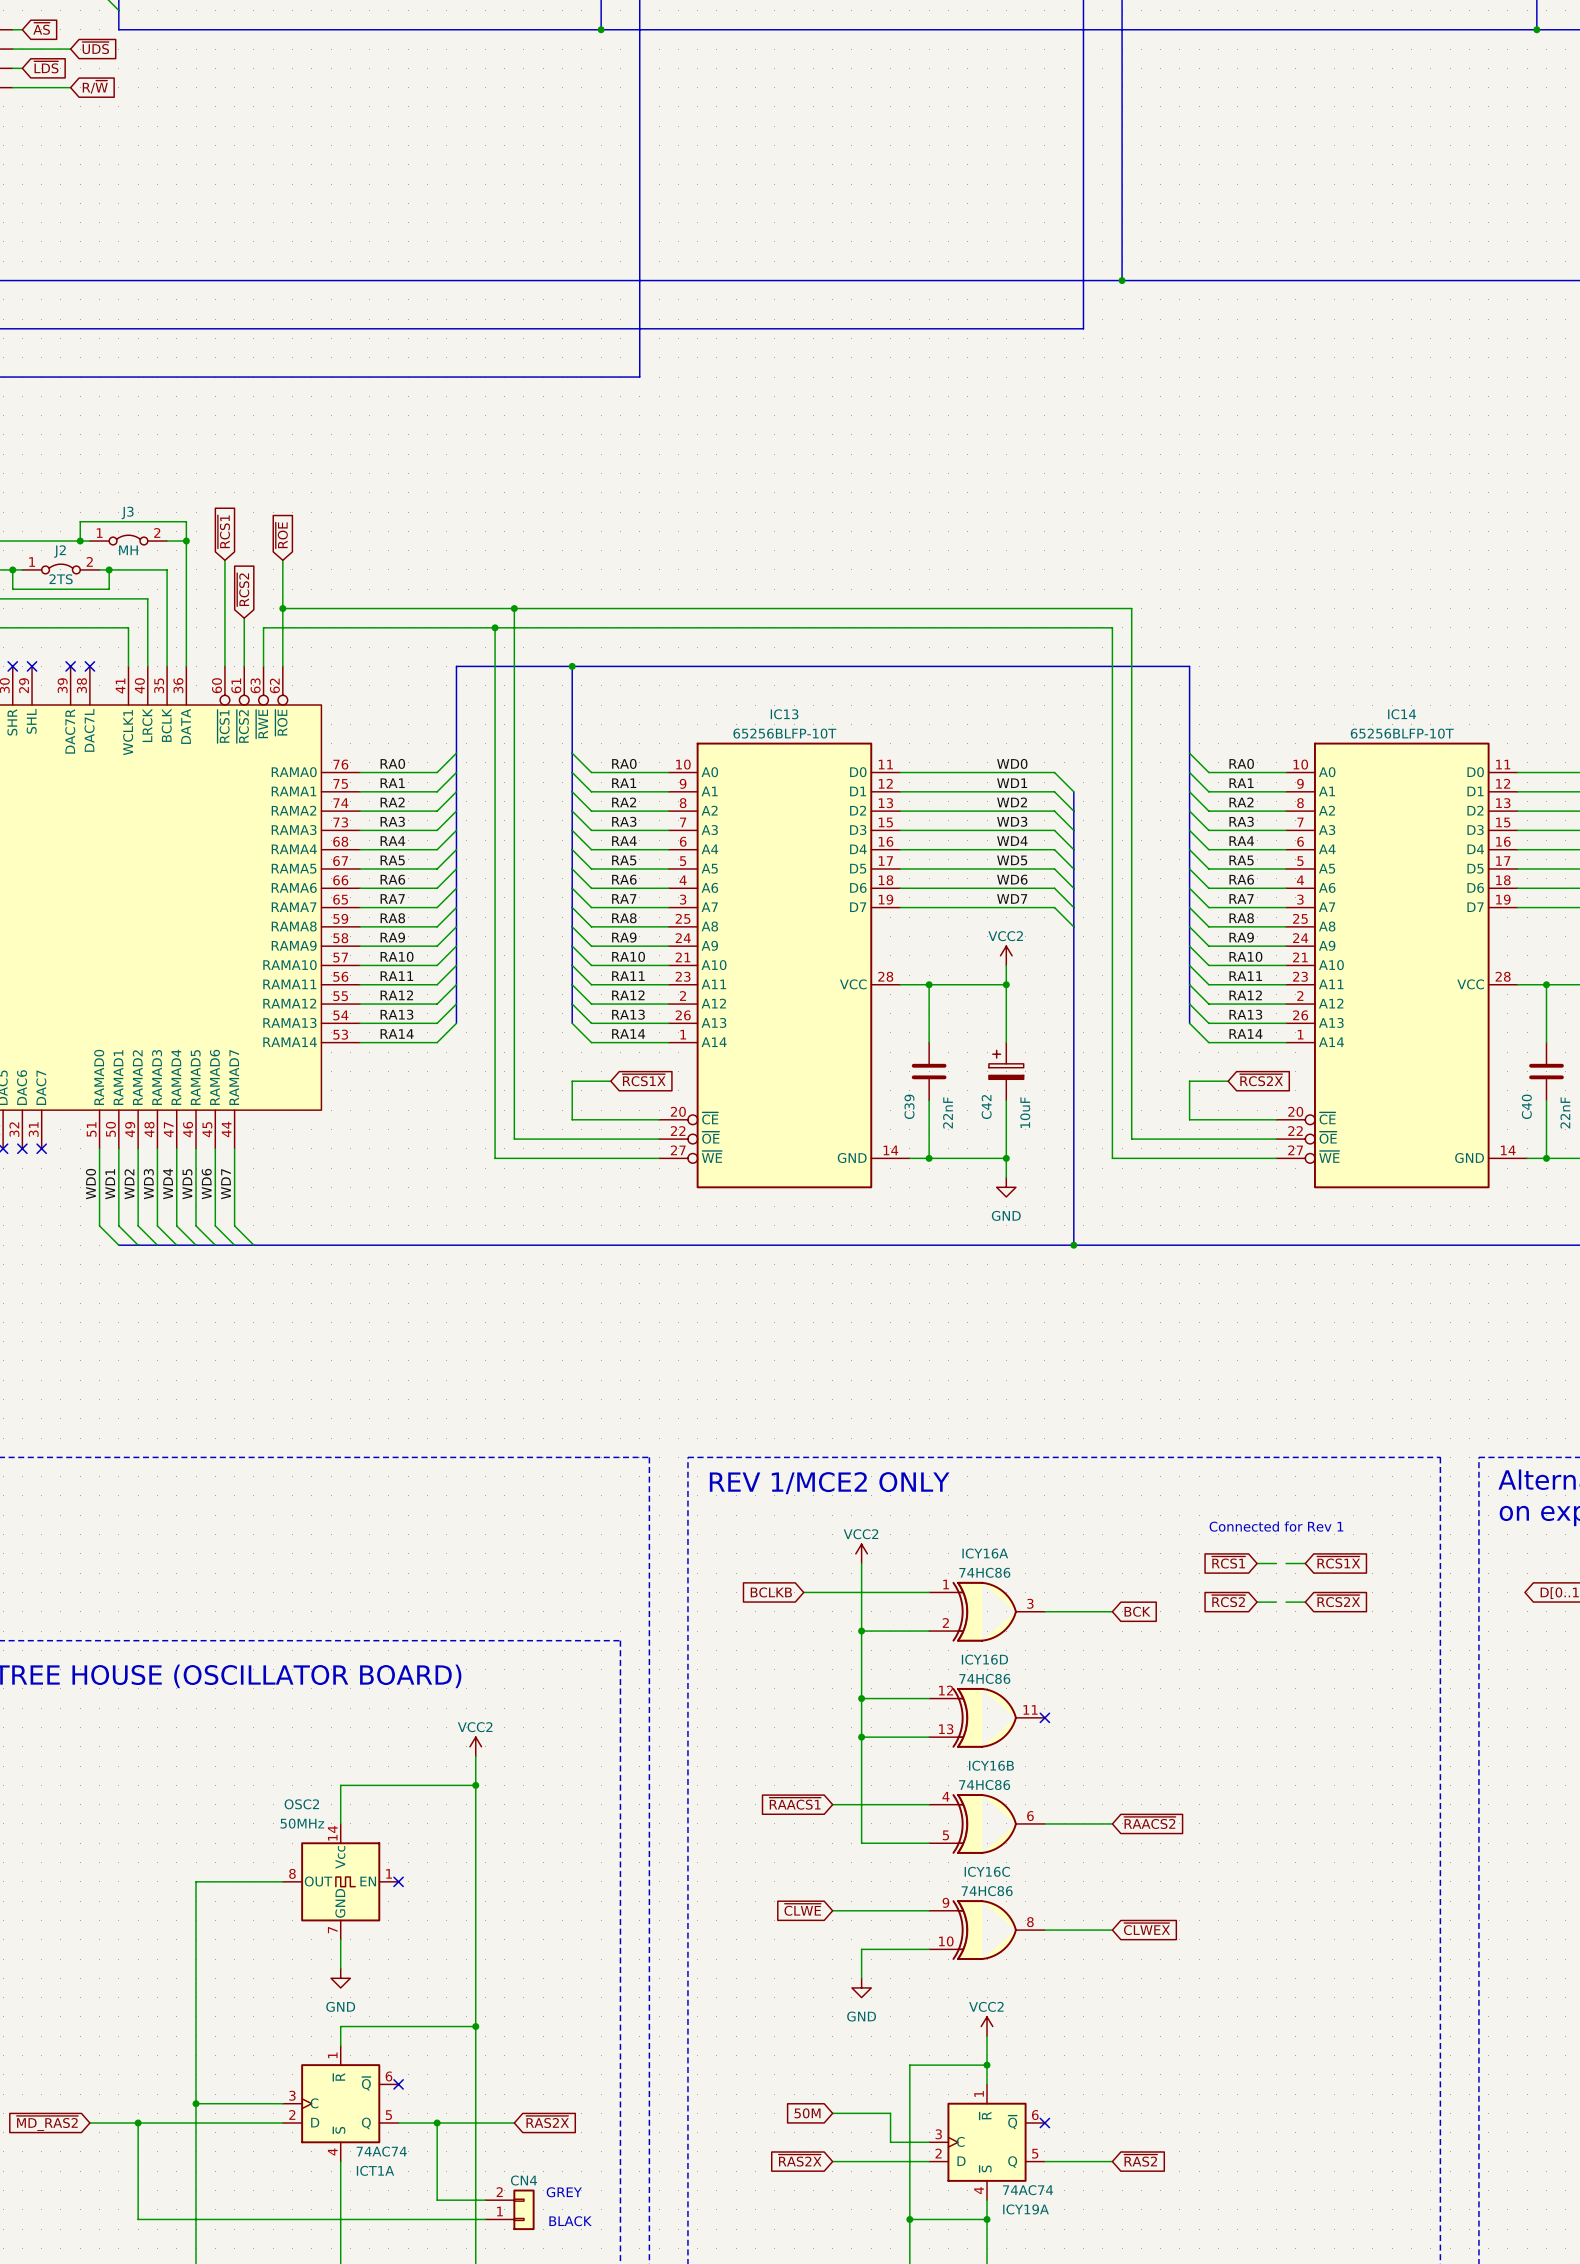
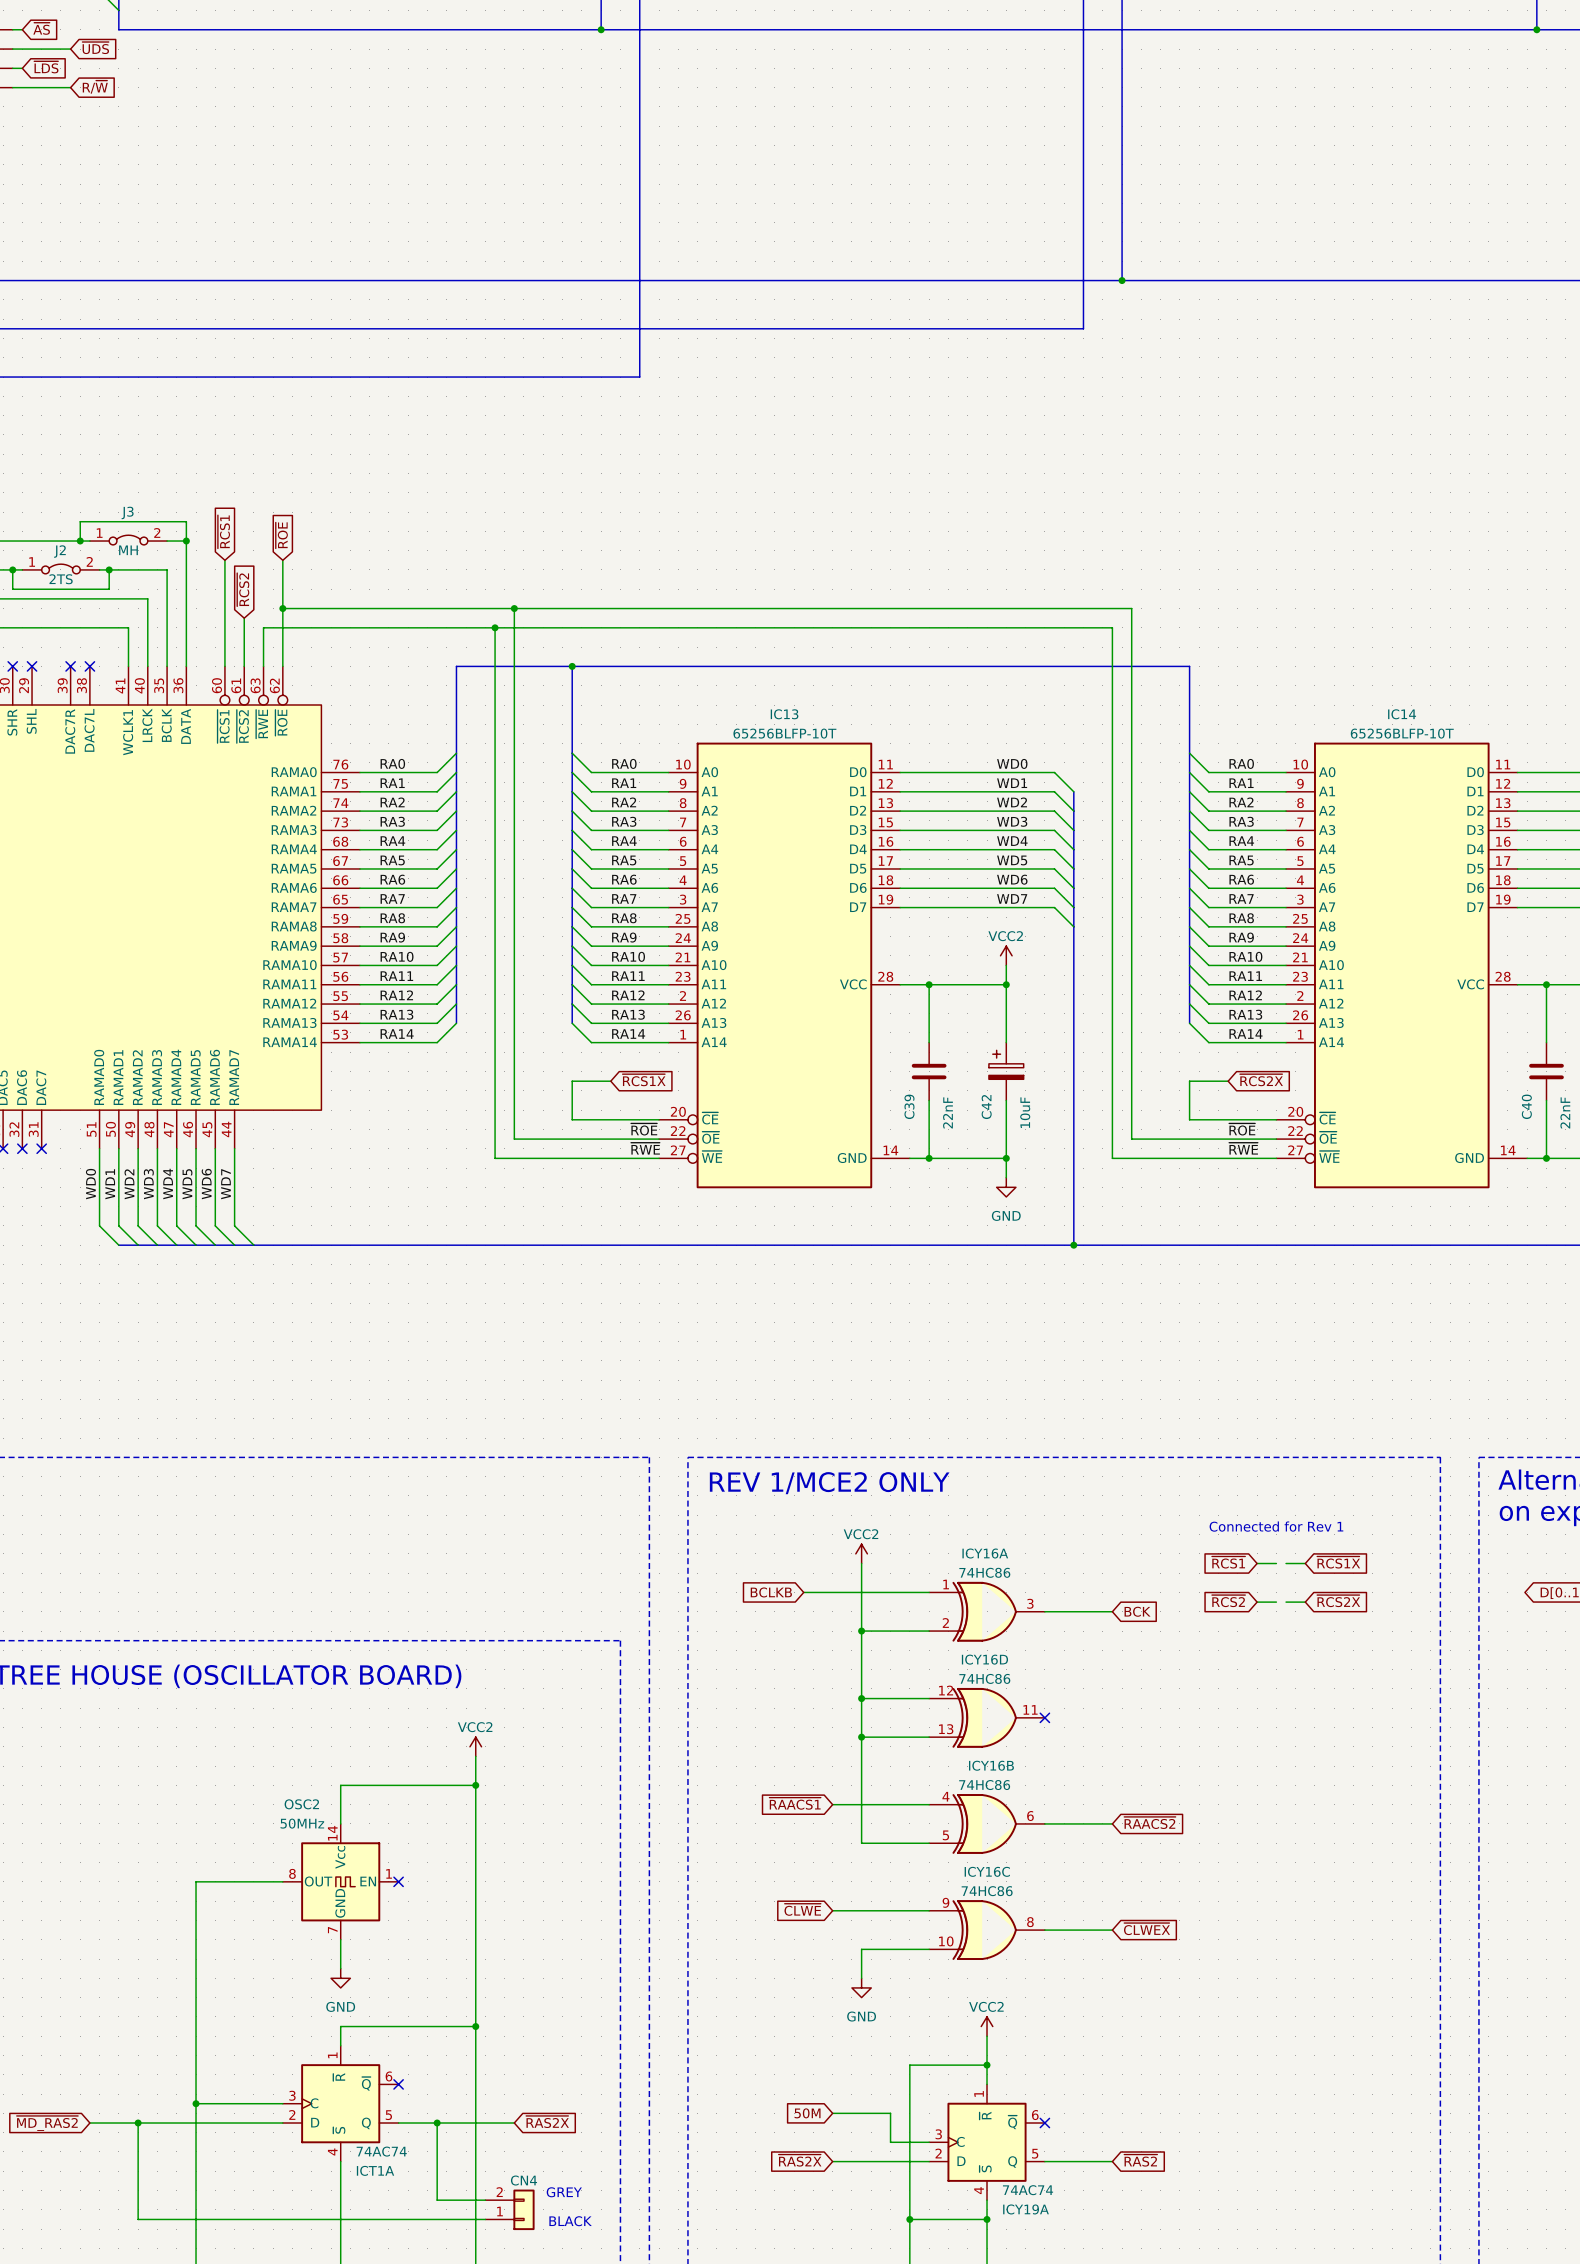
label: none -> ~{ROE} (644, 1129)
label: none -> ~{ROE} (1242, 1129)
label: none -> ~{RWE} (645, 1148)
label: none -> ~{RWE} (1243, 1148)

